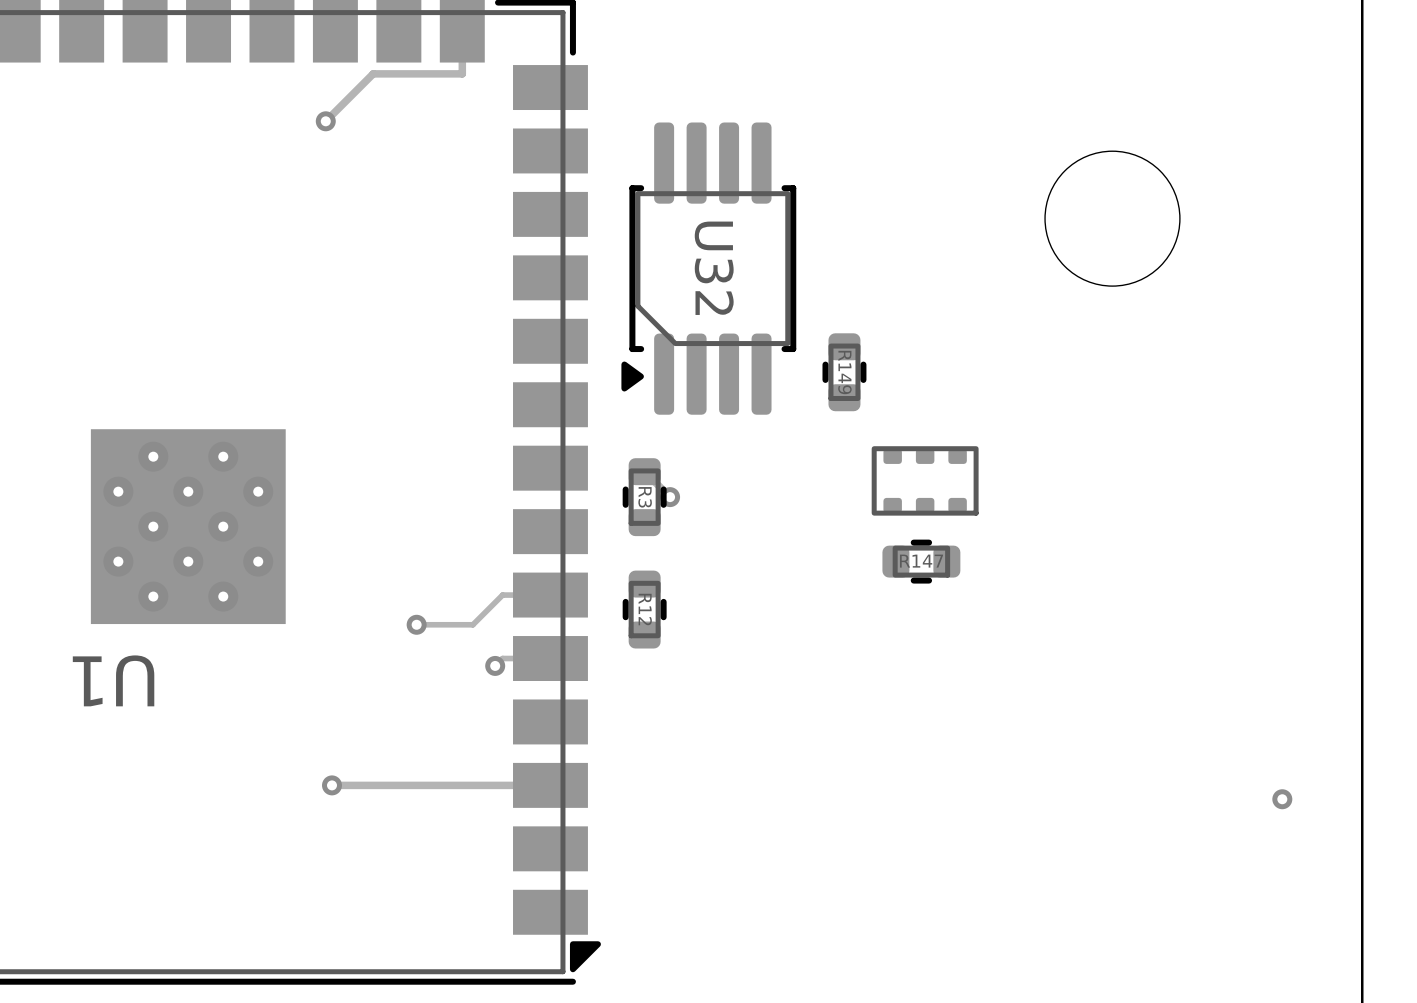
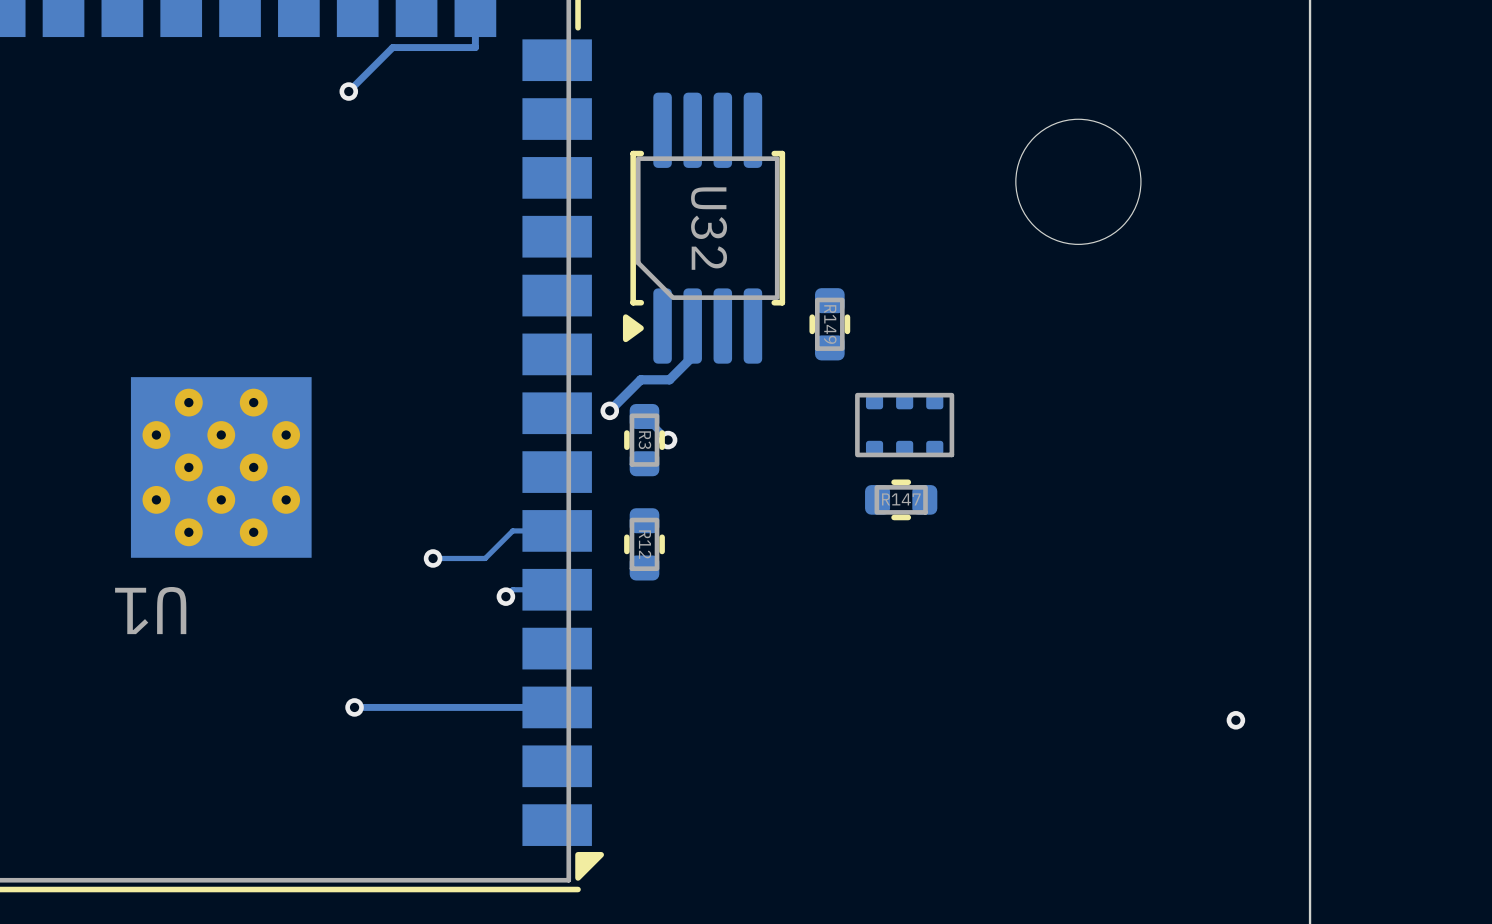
track: none -> (692, 326) (692, 356) (669, 379) (640, 379) (609, 410)
via: none -> (609, 410)

